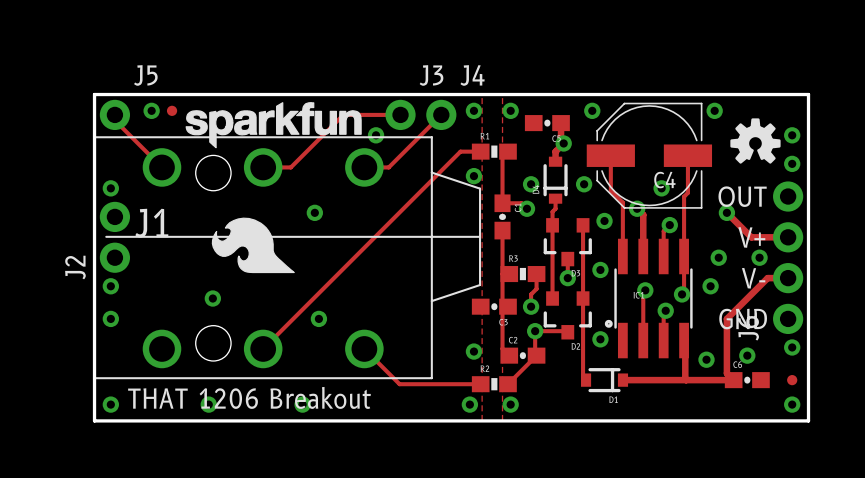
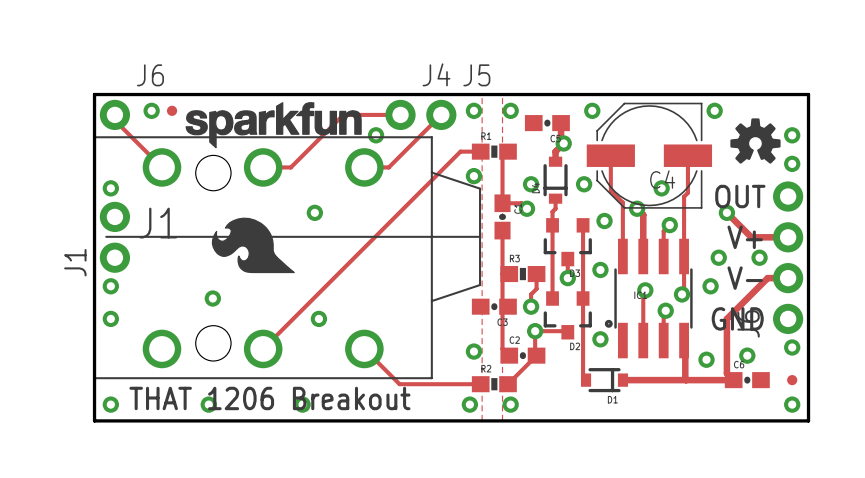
J5 name: J5 (145, 75) -> J6 (150, 75)
J3 name: J3 (431, 75) -> J4 (436, 74)
J4 name: J4 (472, 75) -> J5 (476, 75)
J2 name: J2 (75, 267) -> J1 (75, 262)

